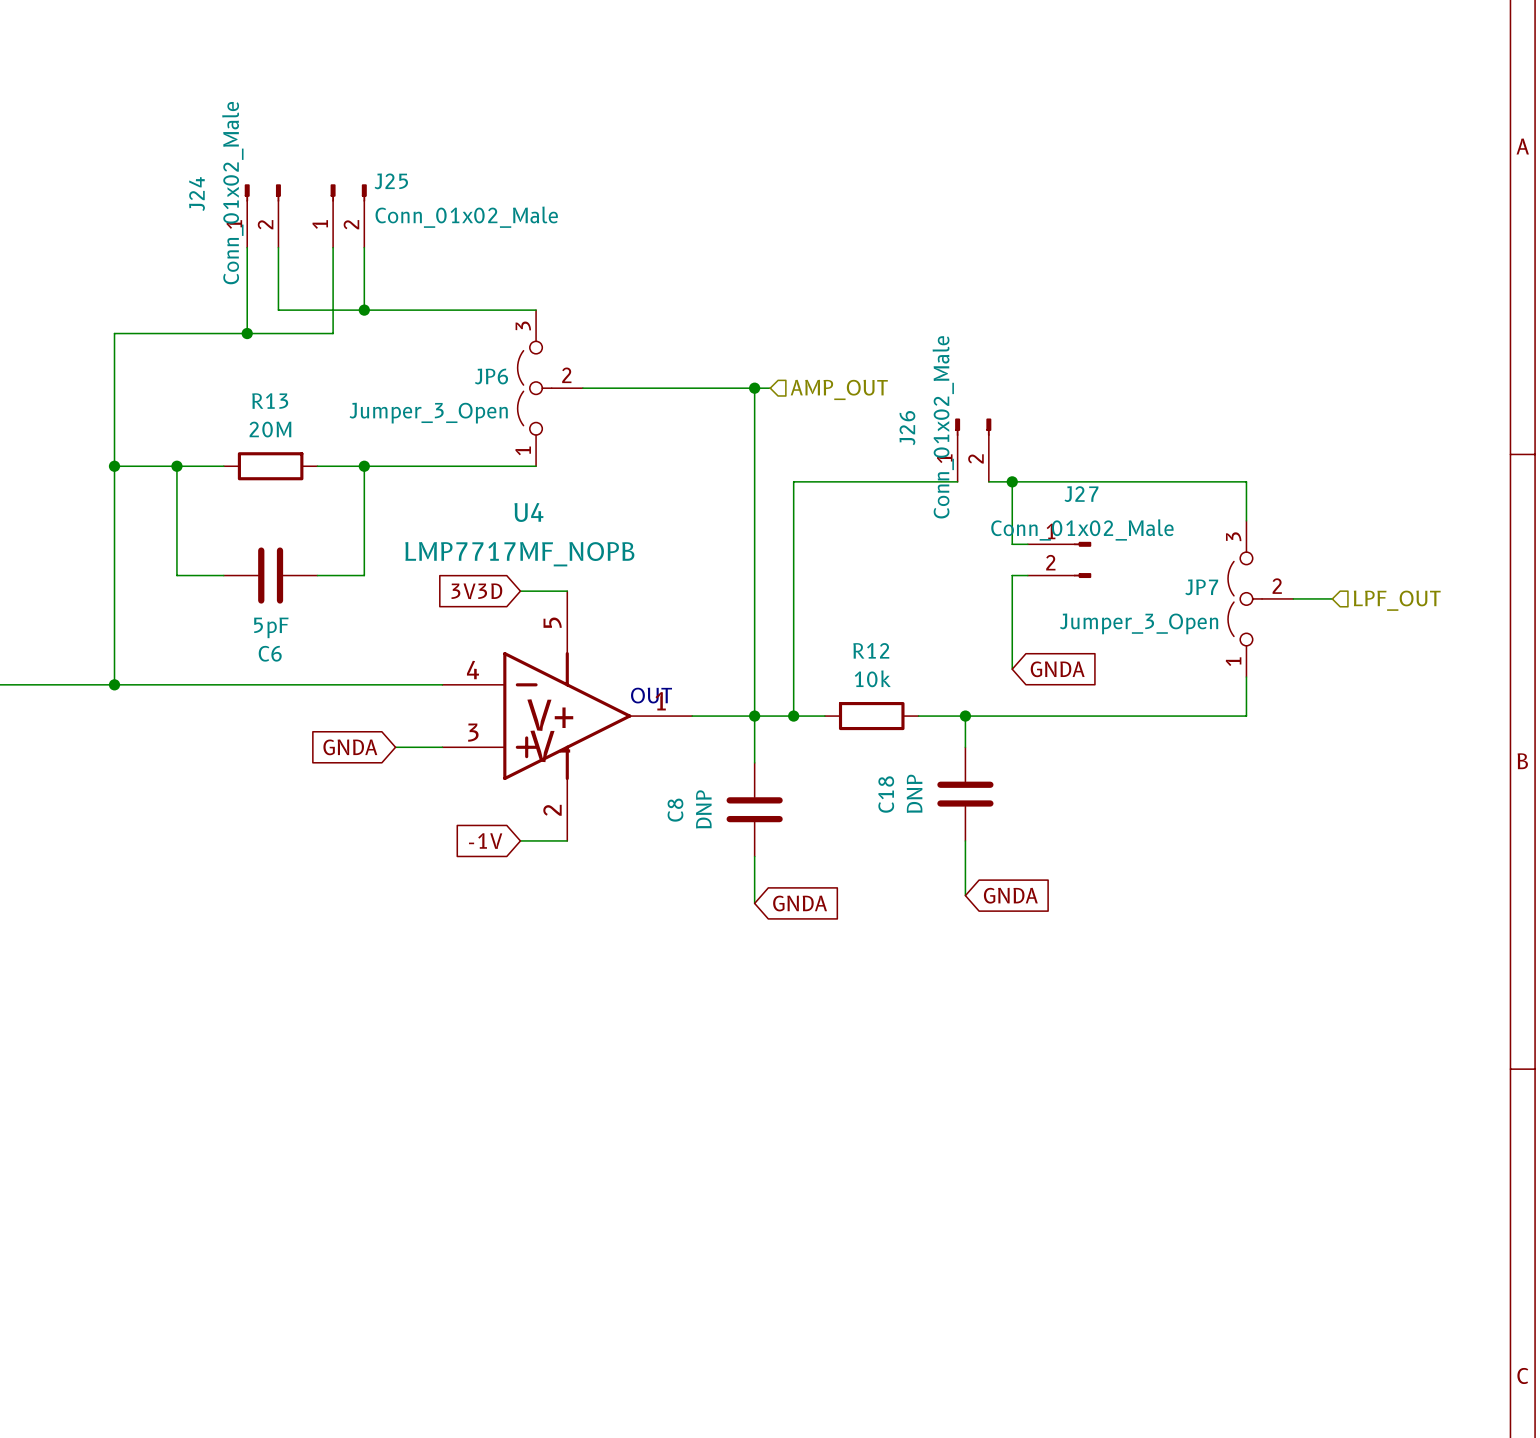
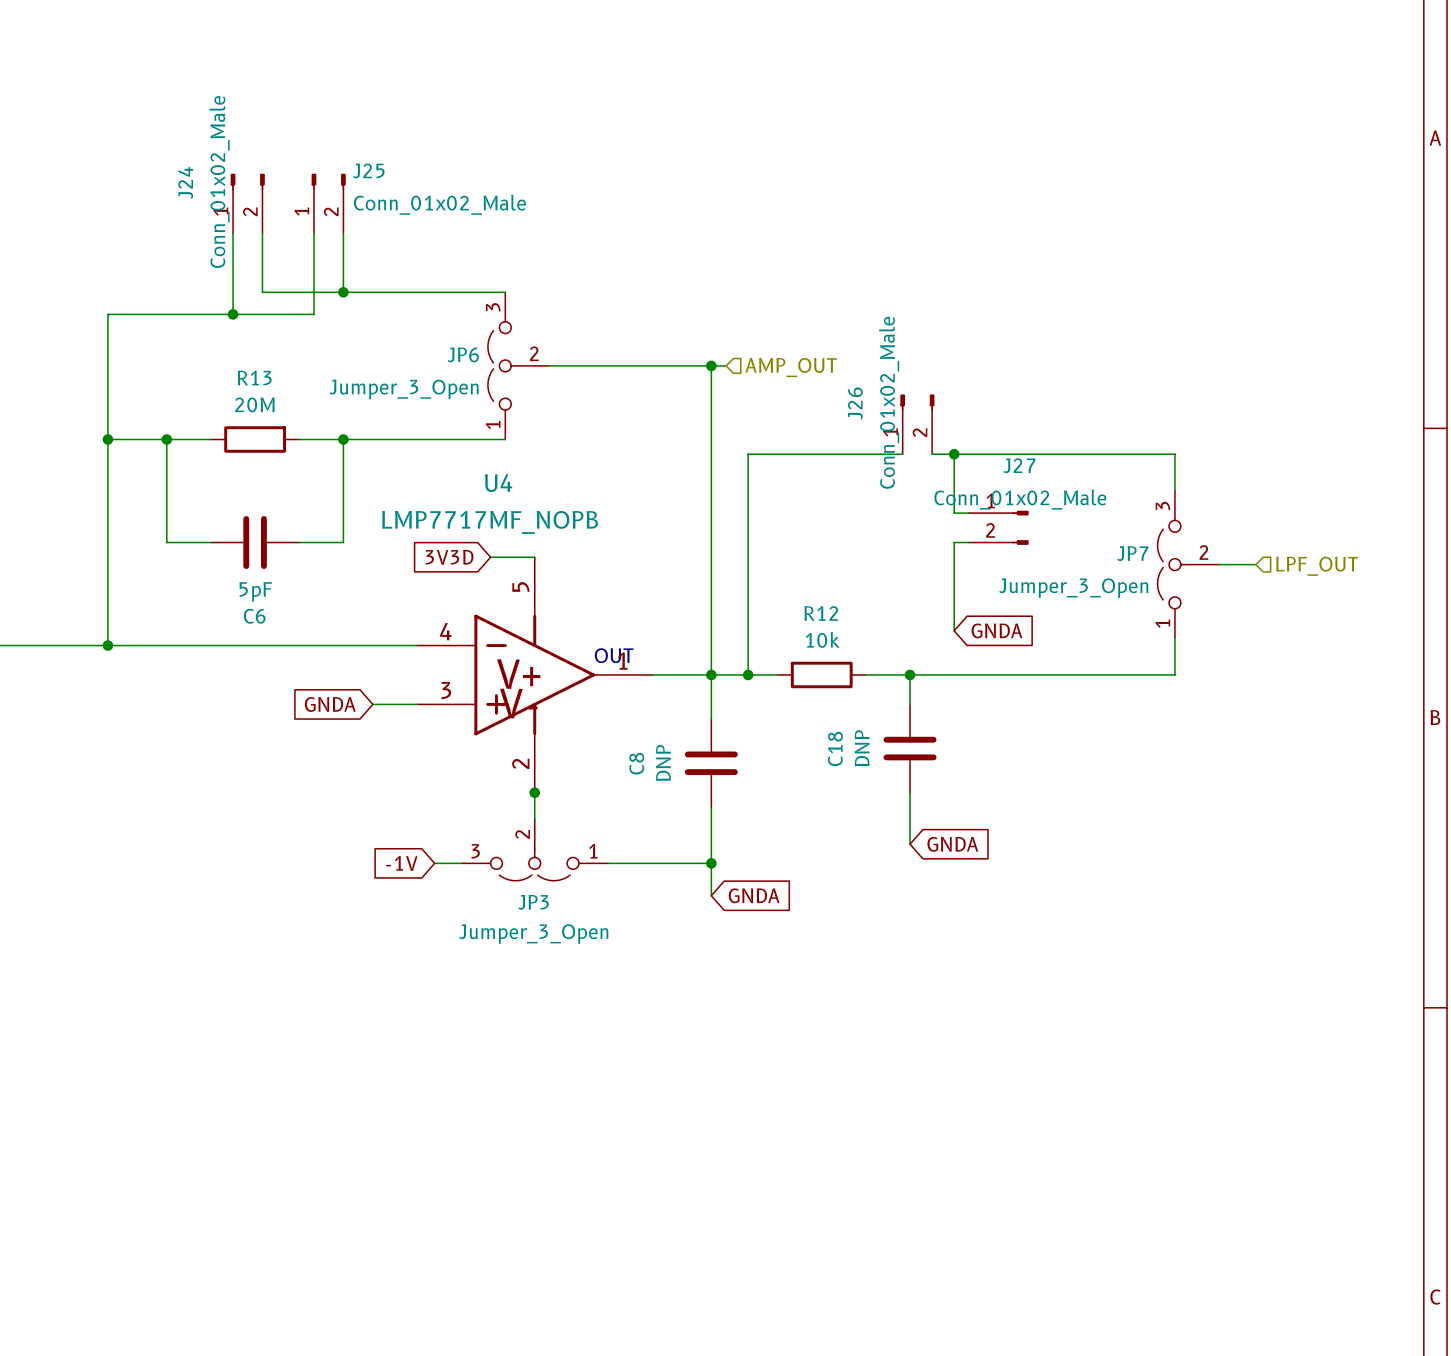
wire: none -> (534, 789) (534, 819)
wire: (520, 840) (567, 840) -> none
junction: none -> (534, 792)
global label position: -1V (485, 841) -> -1V (401, 863)
JP3: none -> Jumper_3_Open (534, 849)
wire: none -> (711, 851) (711, 895)
global label position: GNDA (800, 903) -> GNDA (754, 895)
wire: none -> (434, 863) (461, 863)
wire: none -> (608, 863) (711, 863)
junction: none -> (711, 863)

